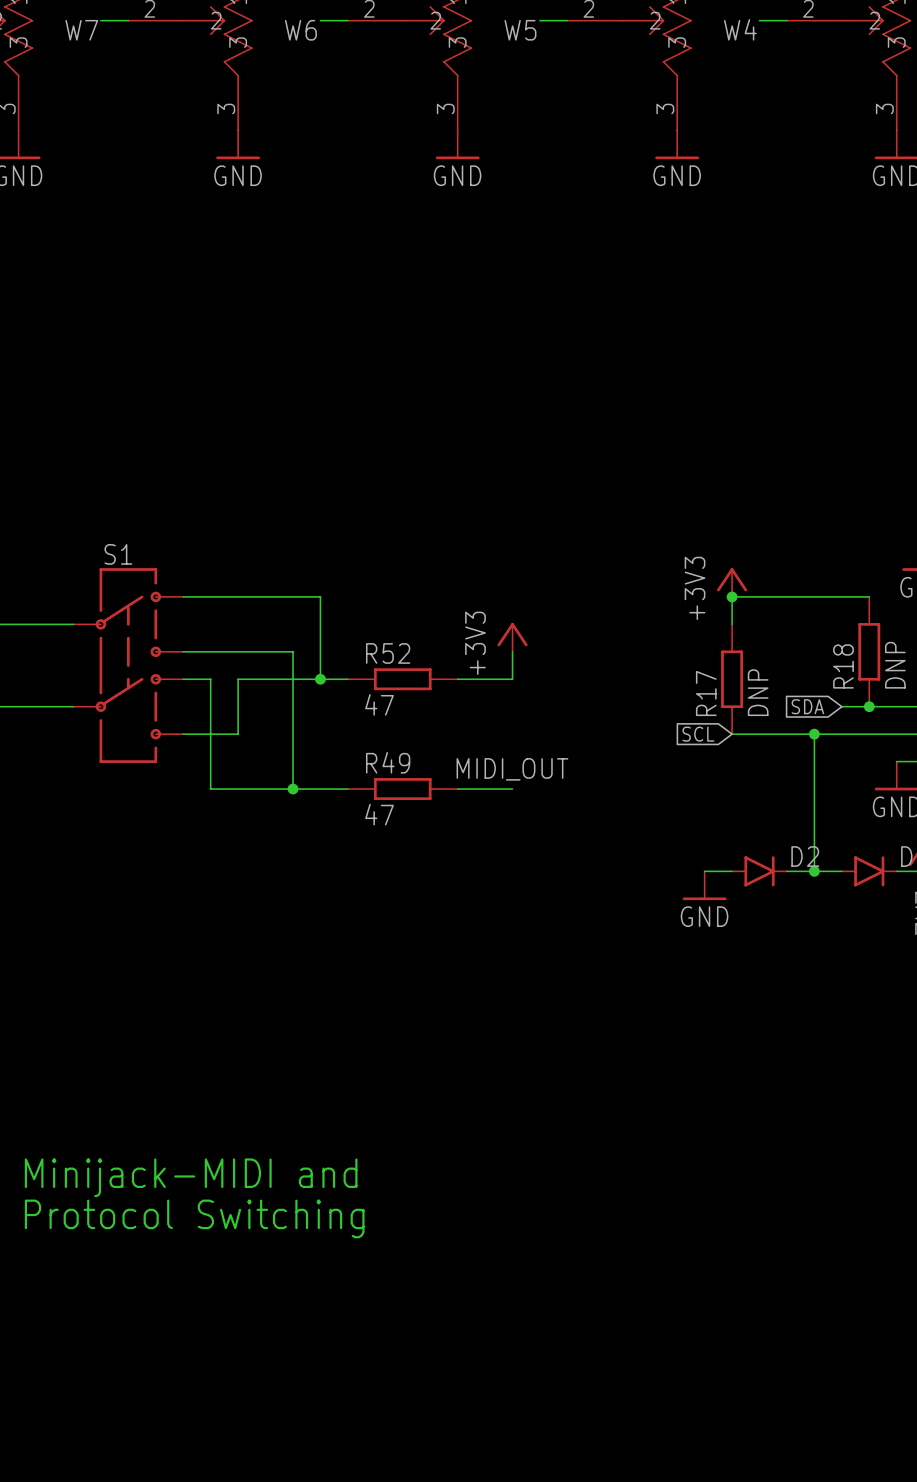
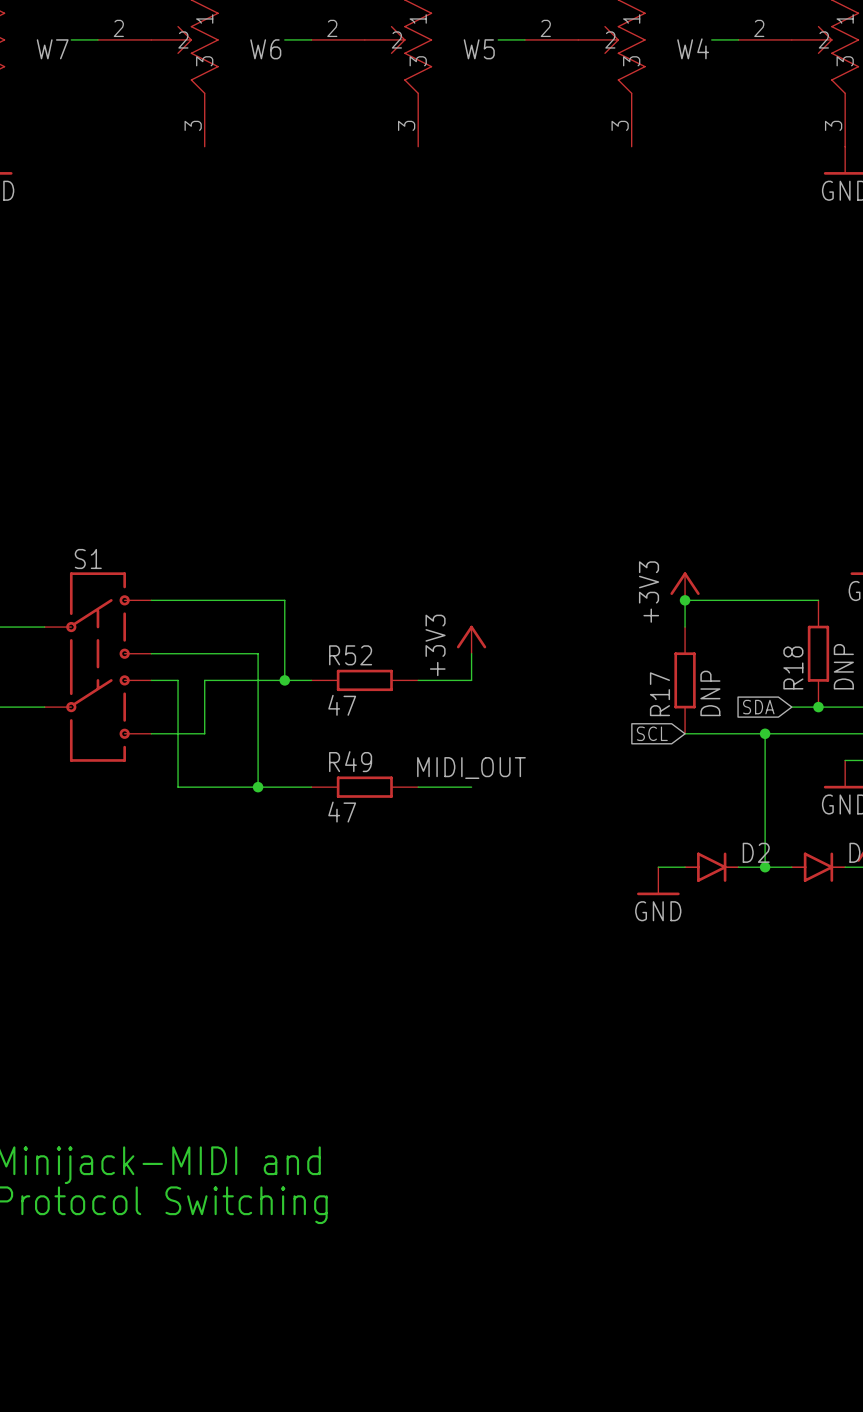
power symbol: GND (238, 144) -> none
power symbol: GND (457, 144) -> none
power symbol: GND (677, 144) -> none

